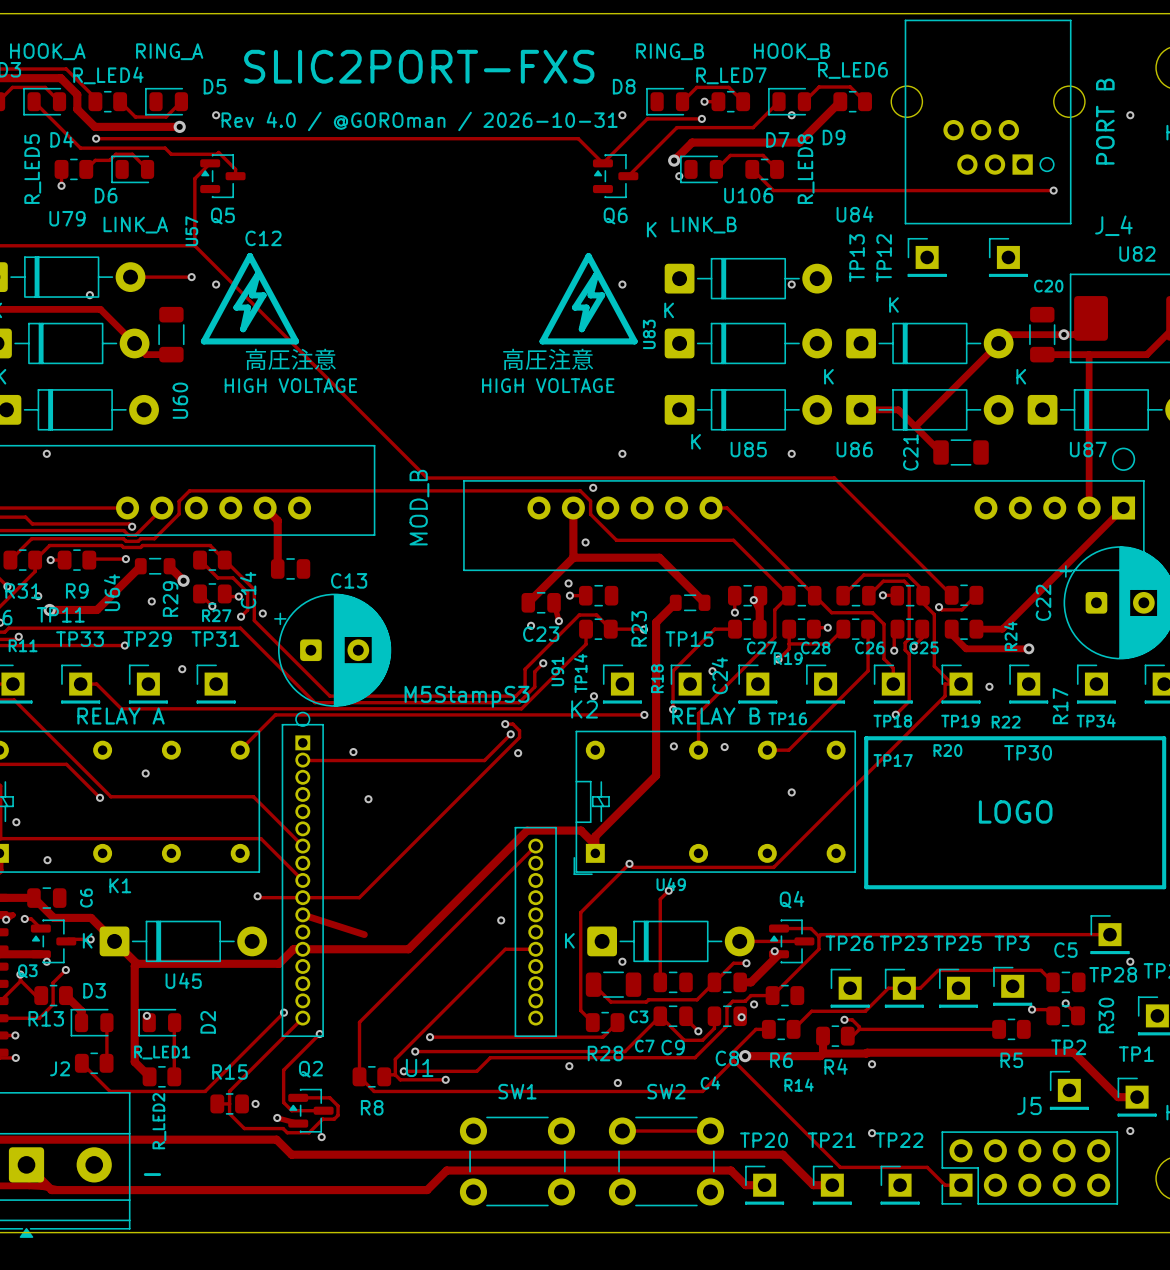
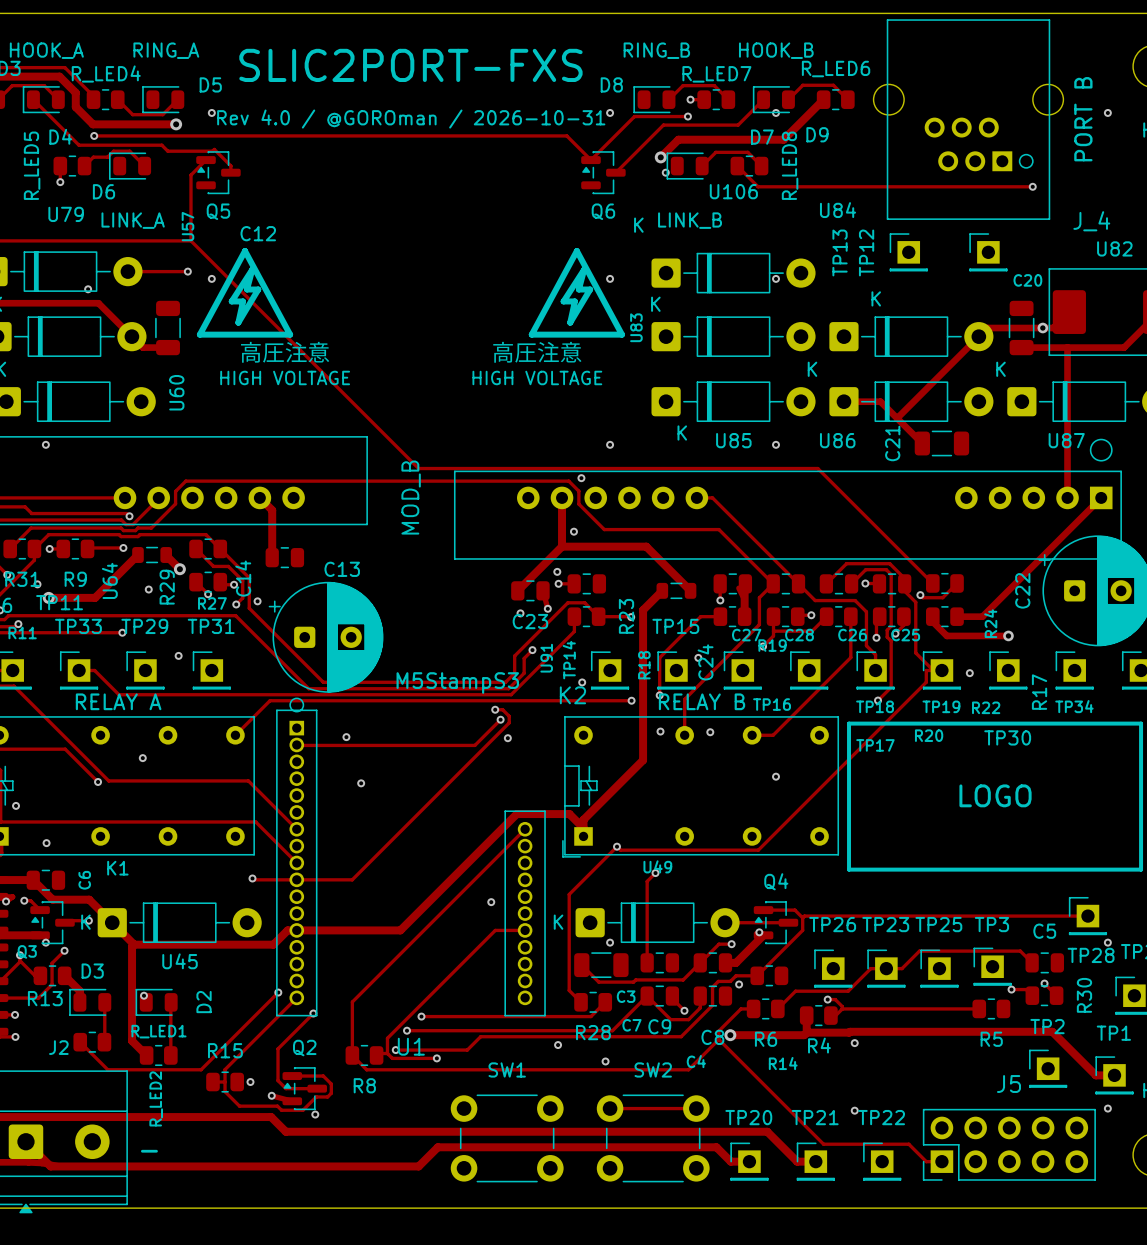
via: (753, 600) -> none
track: (302, 914) (364, 934) -> none
via: (741, 1017) -> none

